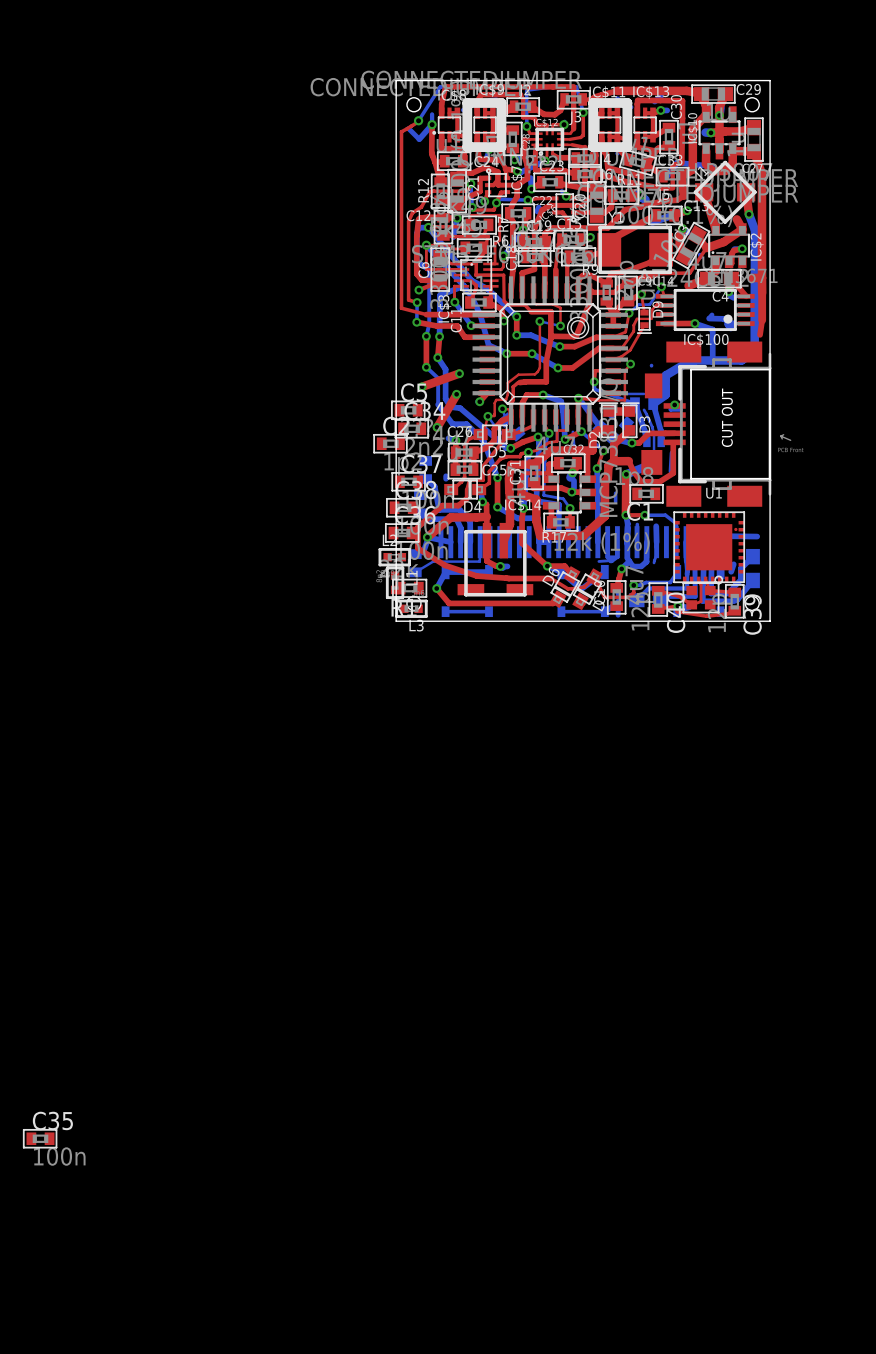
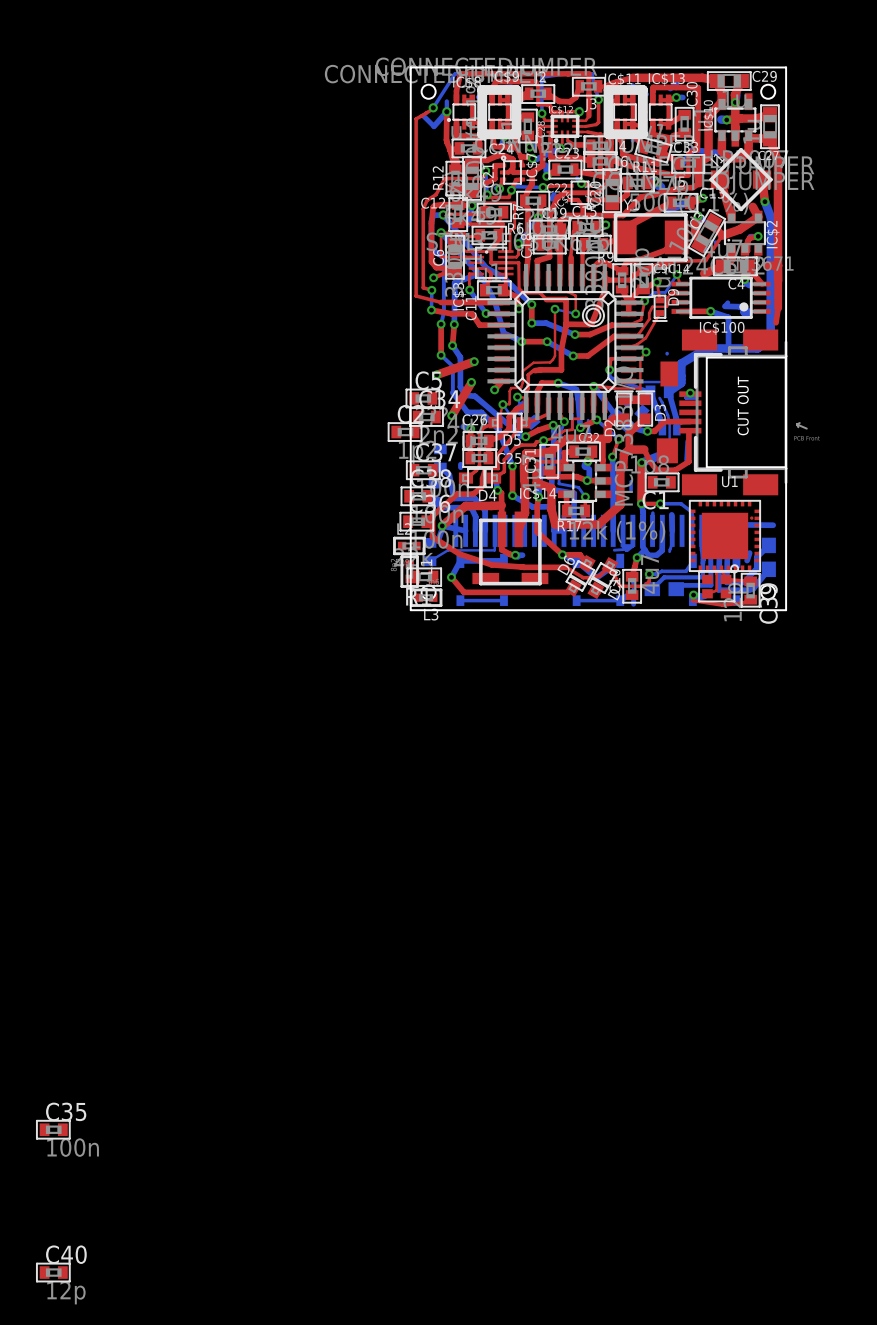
top track: (658, 590) (678, 596) (691, 604) -> none
C40 rotation: 0° (658, 599) -> 90° counterclockwise (53, 1272)
C40 position: (658, 599) -> (53, 1272)
top track: (677, 606) (658, 608) -> none

